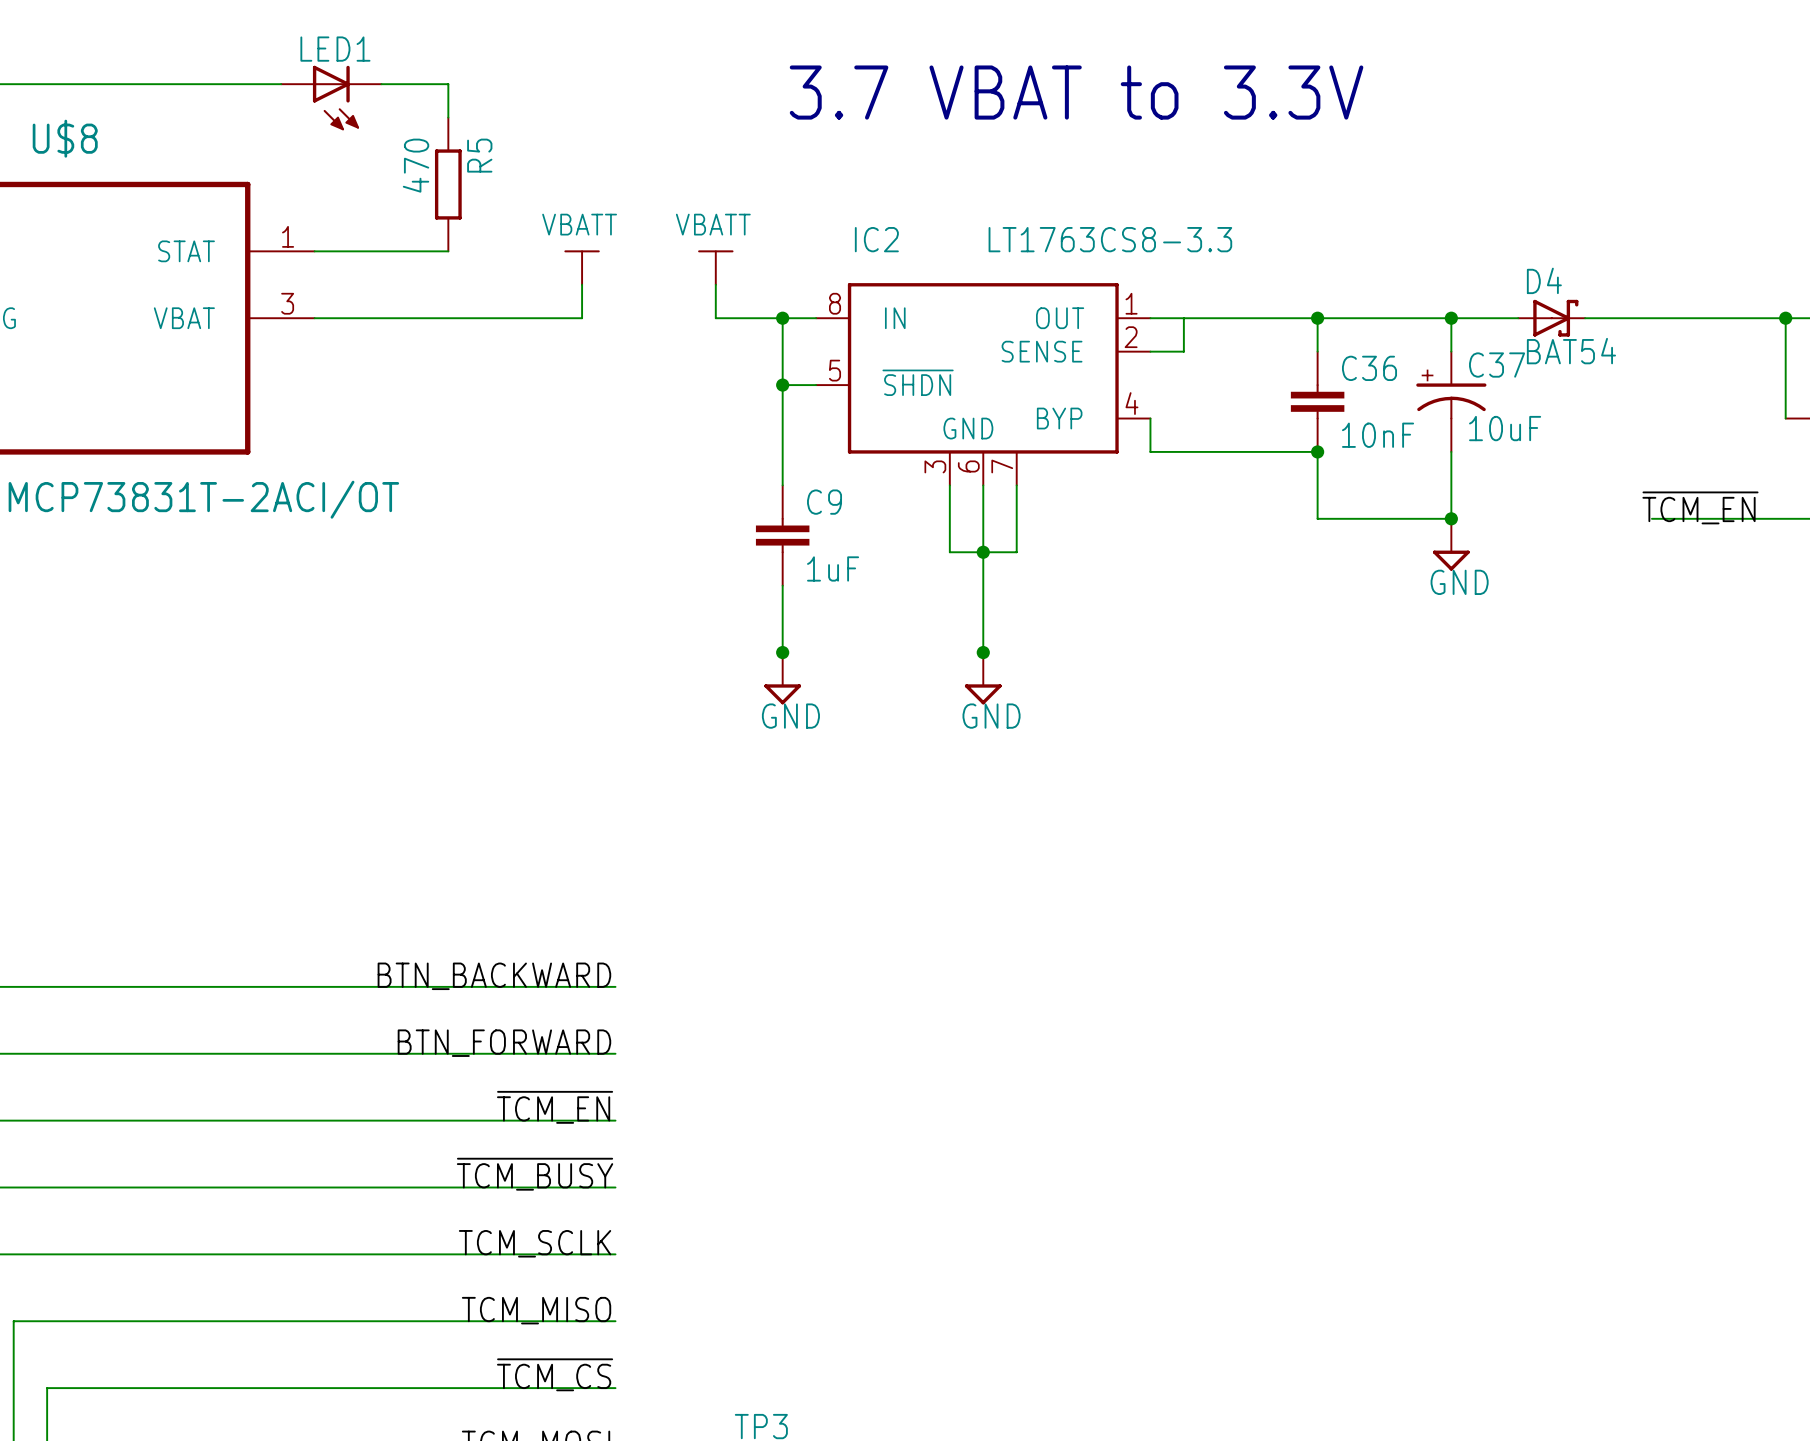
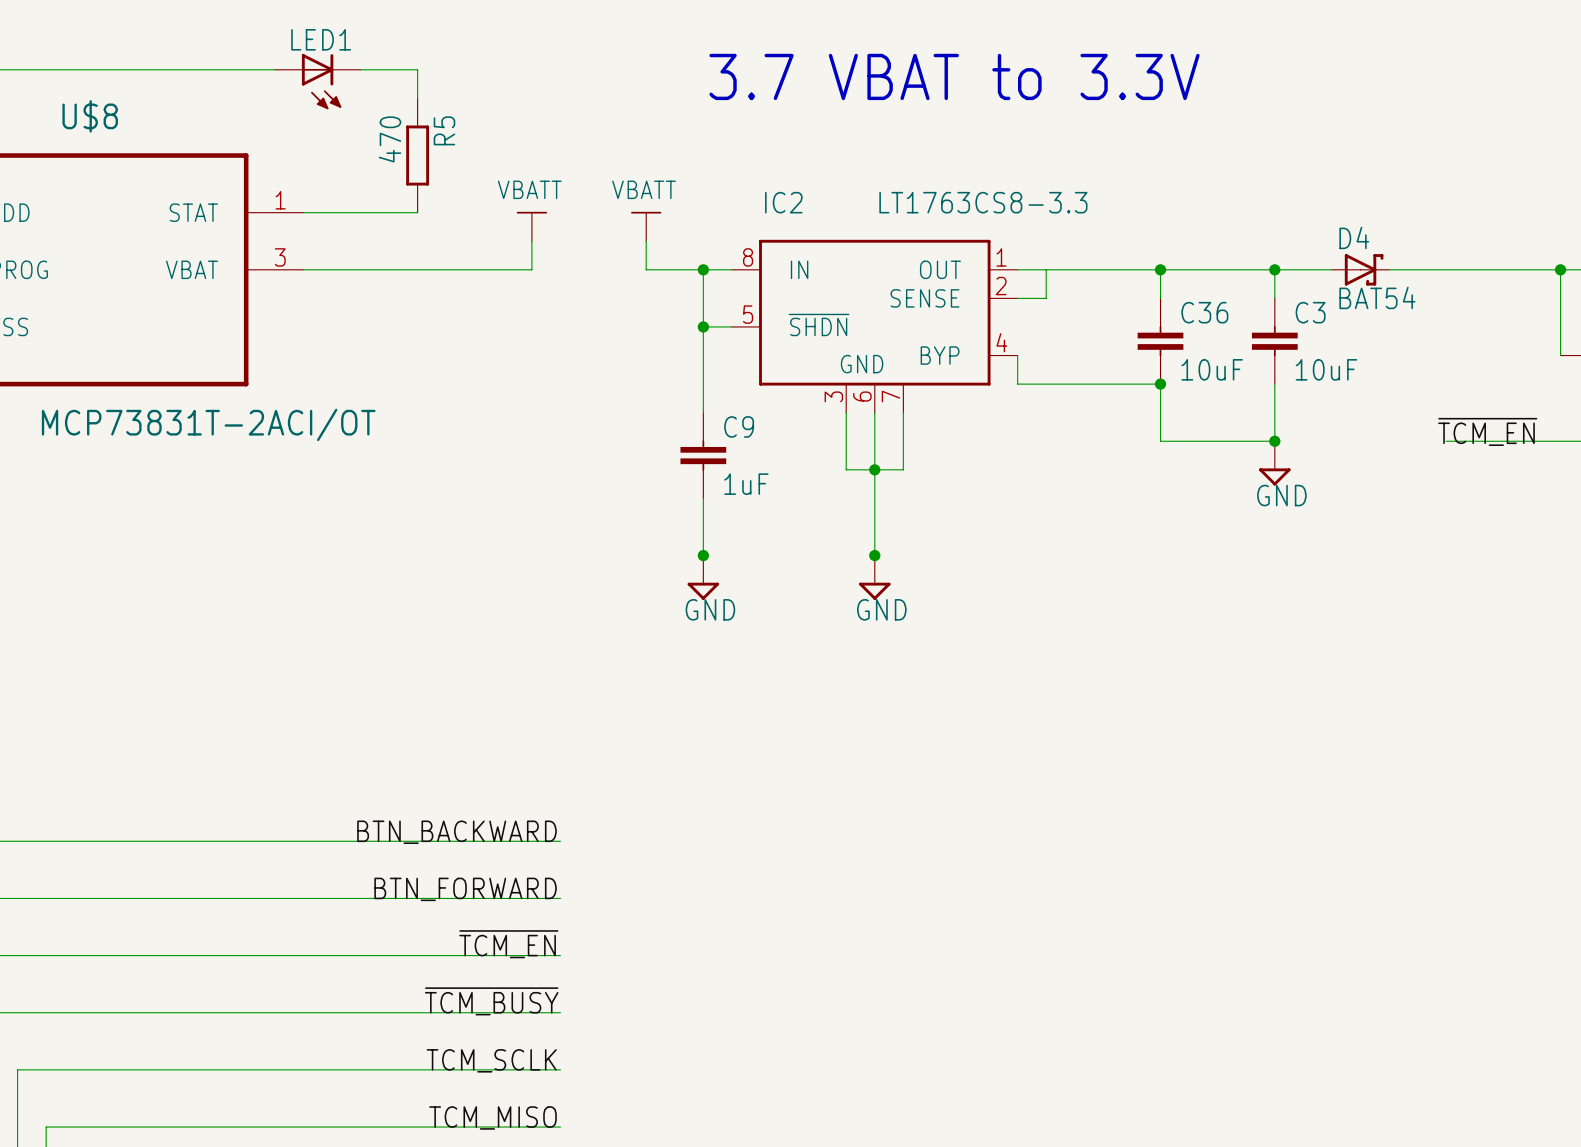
C37: 10uF (1451, 401) -> none
C3: none -> 10uF (1274, 341)
C36 value: 10nF (1378, 435) -> 10uF (1212, 369)

